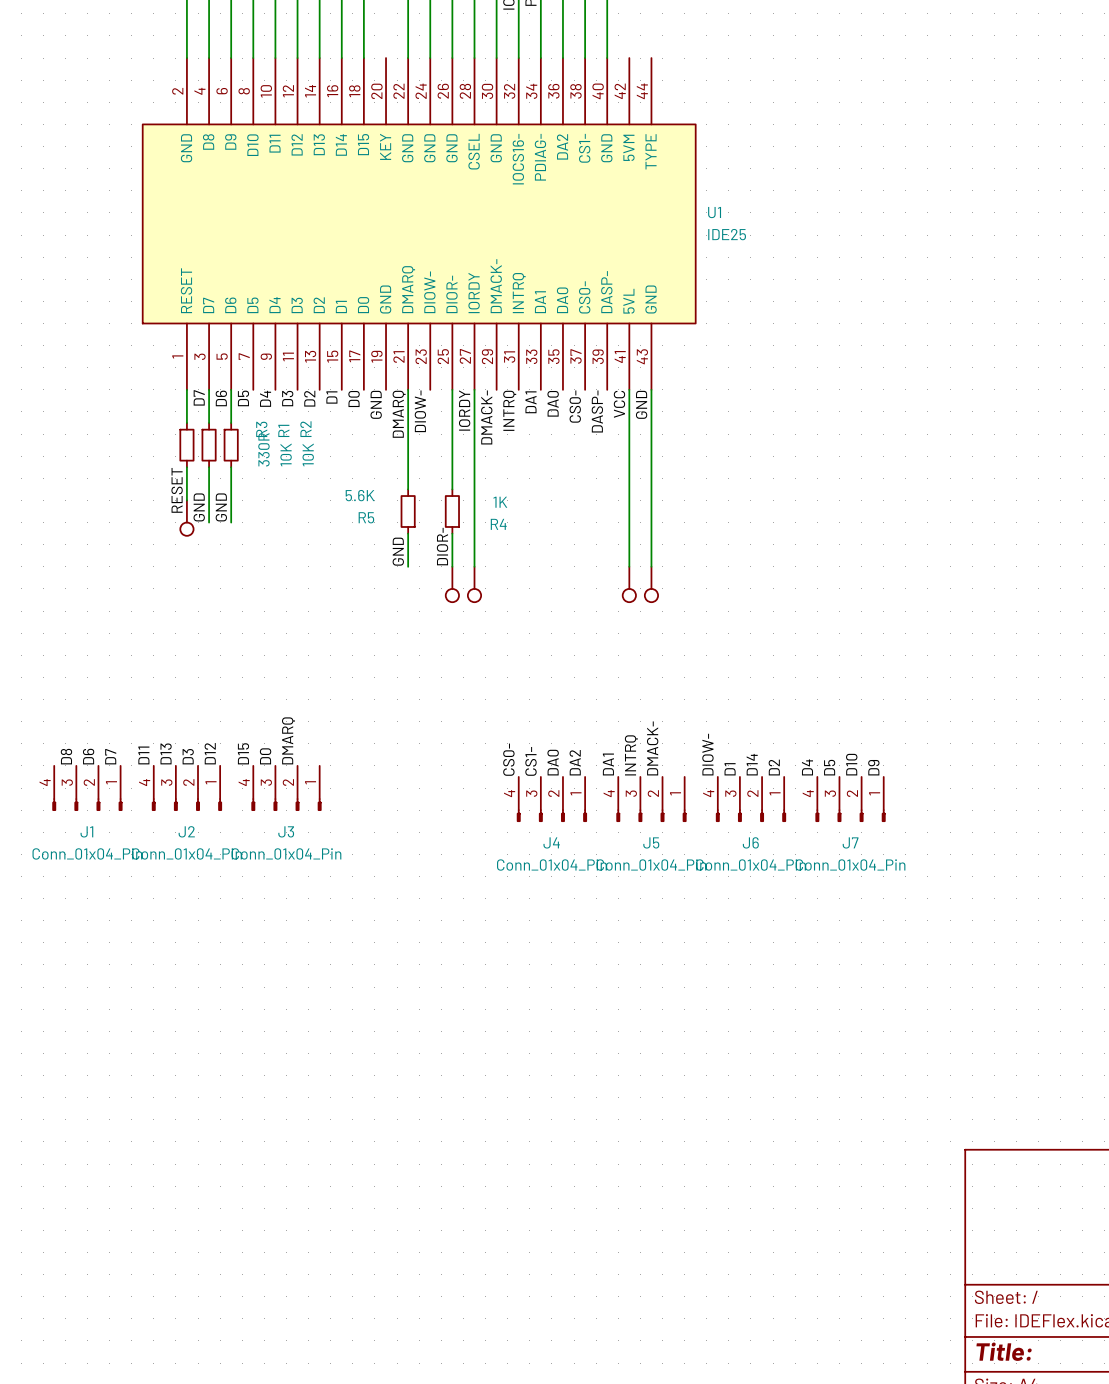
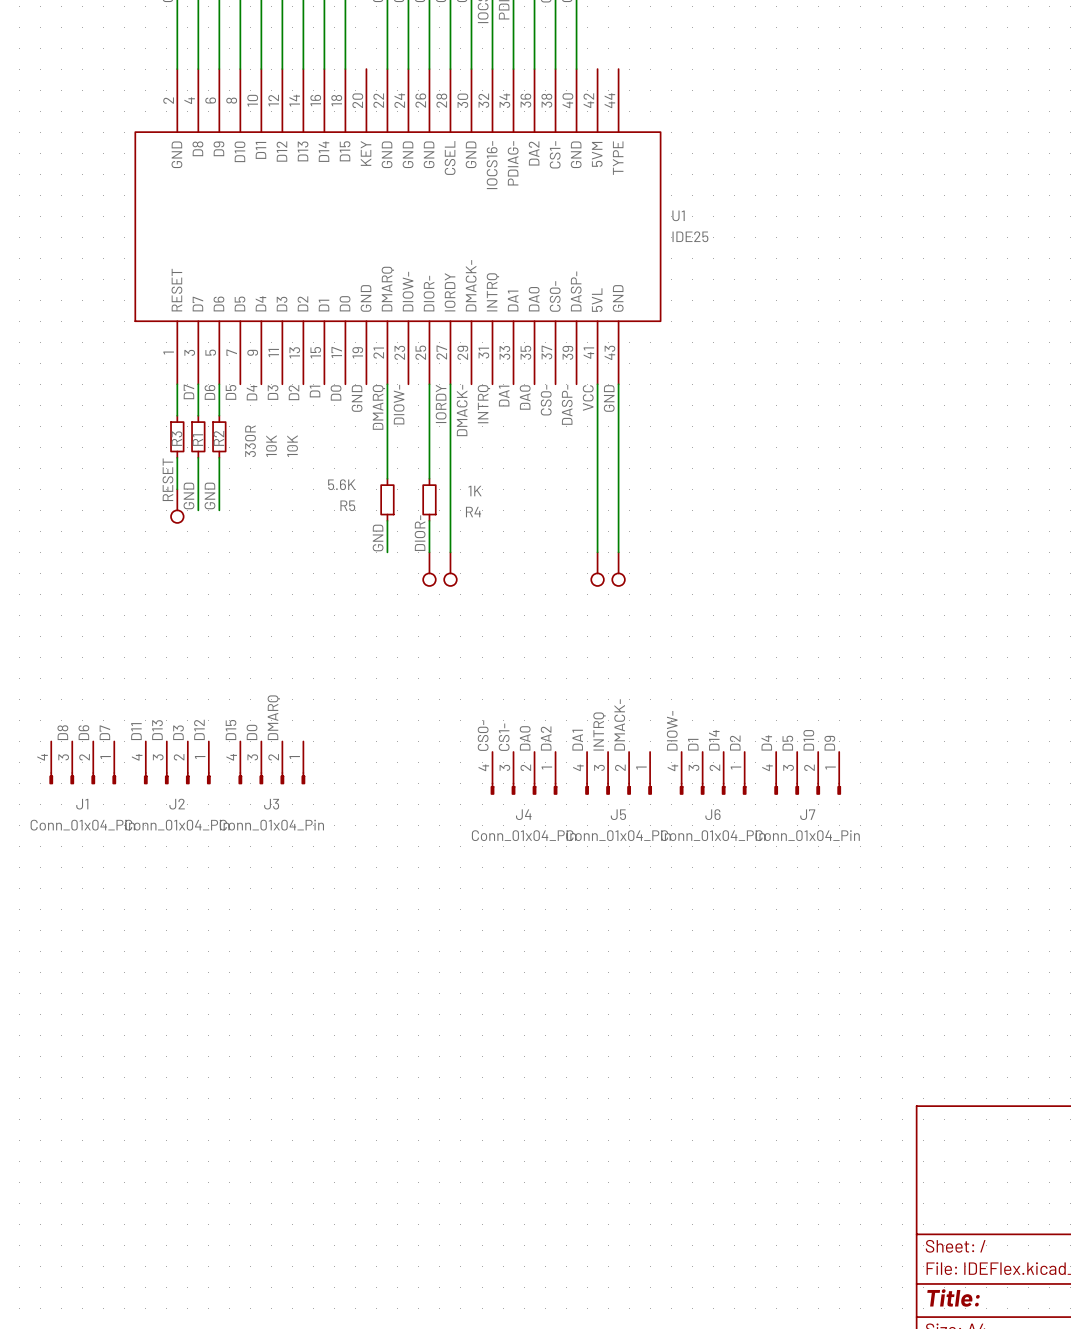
R3 name position: R3 (261, 429) -> R3 (176, 438)
R2 name position: R2 (305, 429) -> R2 (218, 438)
R1 name position: R1 (283, 430) -> R1 (197, 440)

